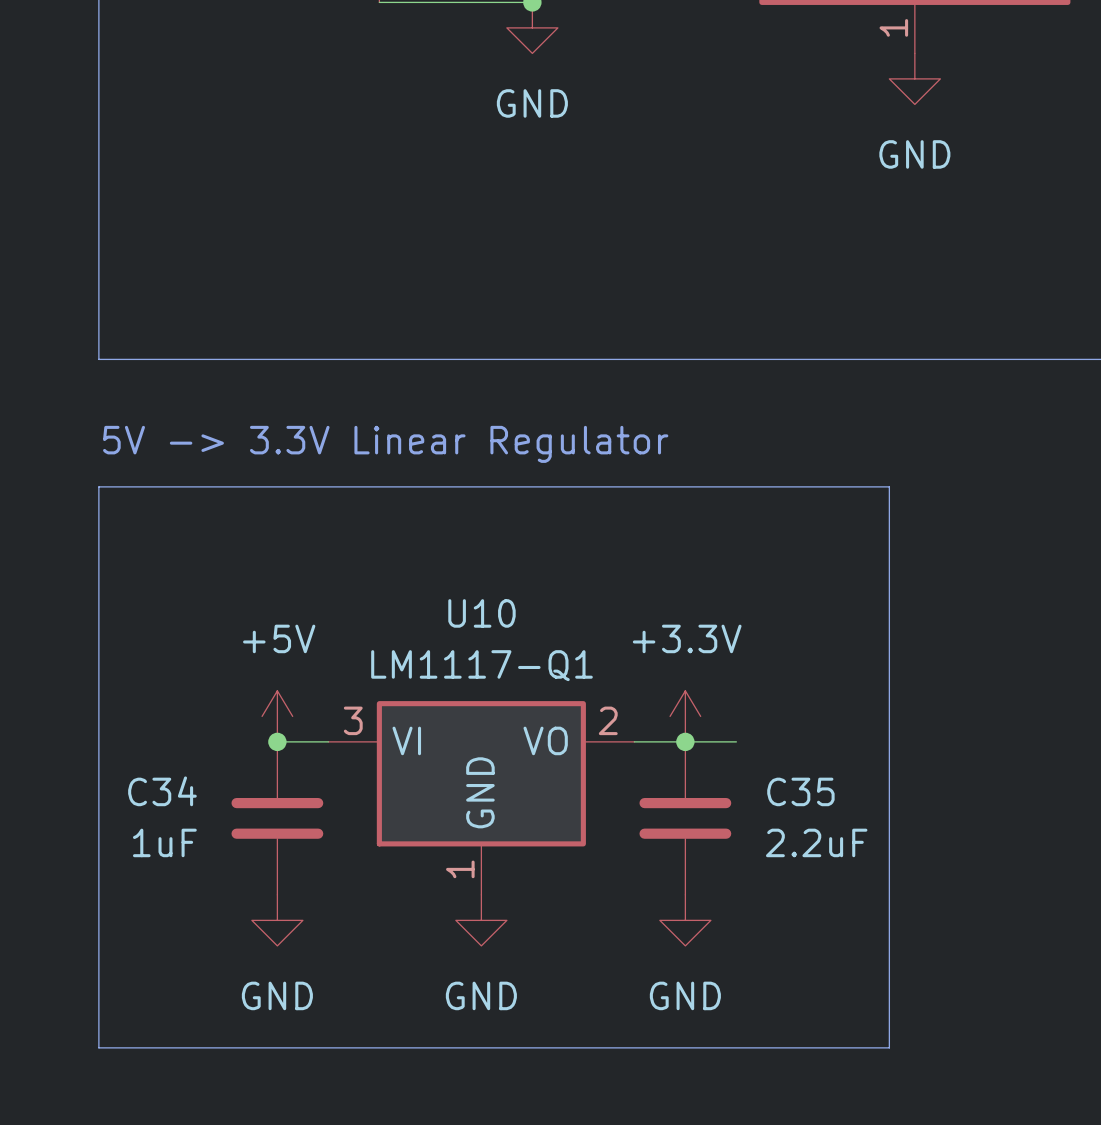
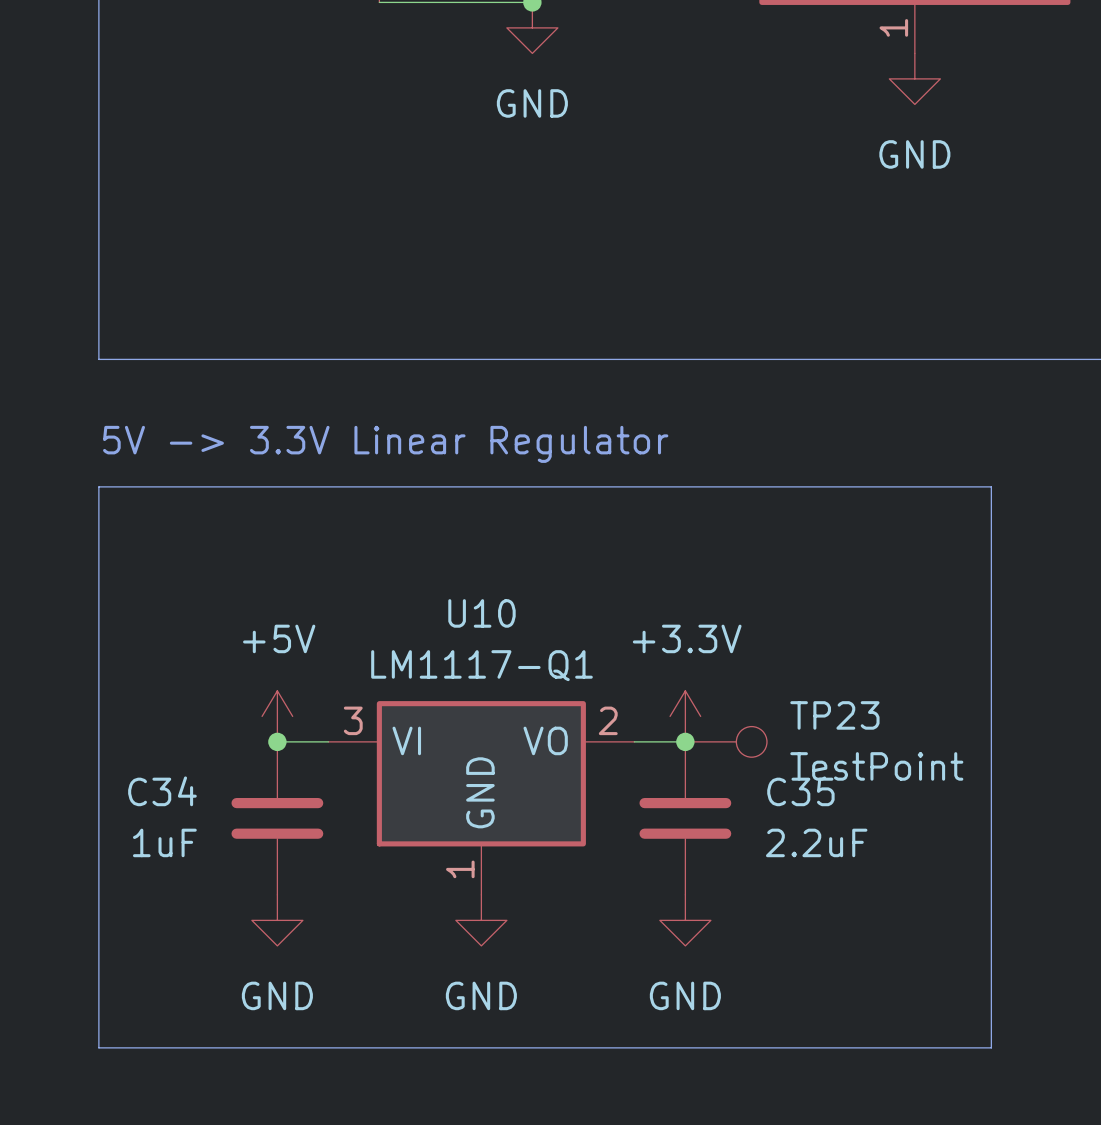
line: (889, 486) (889, 1047) -> (889, 486) (991, 486) (991, 1047) (889, 1047)
TP23: none -> TestPoint (726, 741)

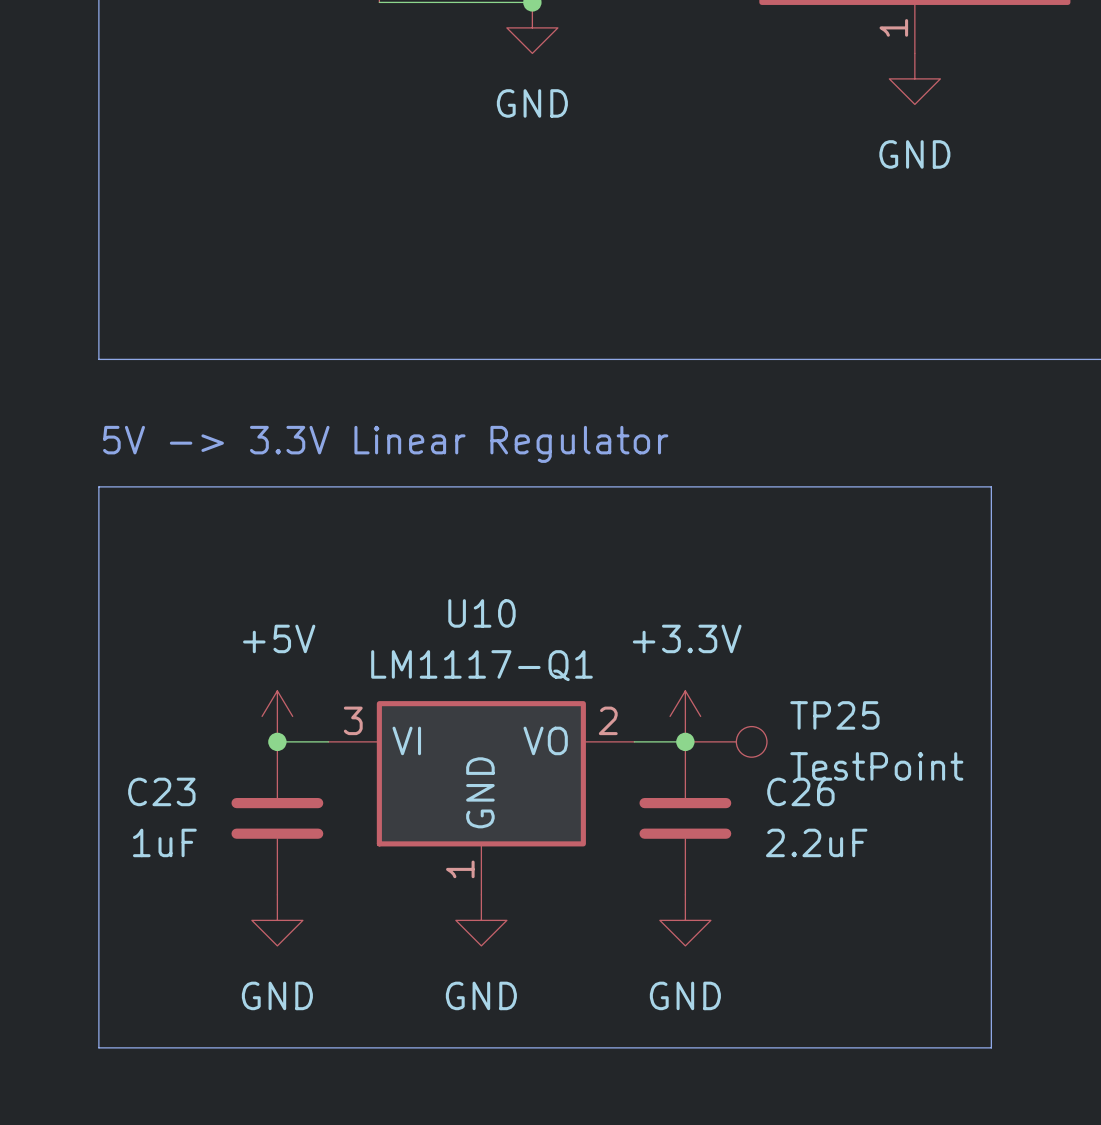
TP23 name: TP23 (834, 715) -> TP25 (834, 715)
C34 name: C34 (162, 791) -> C23 (161, 791)
C35 name: C35 (800, 791) -> C26 (800, 791)

